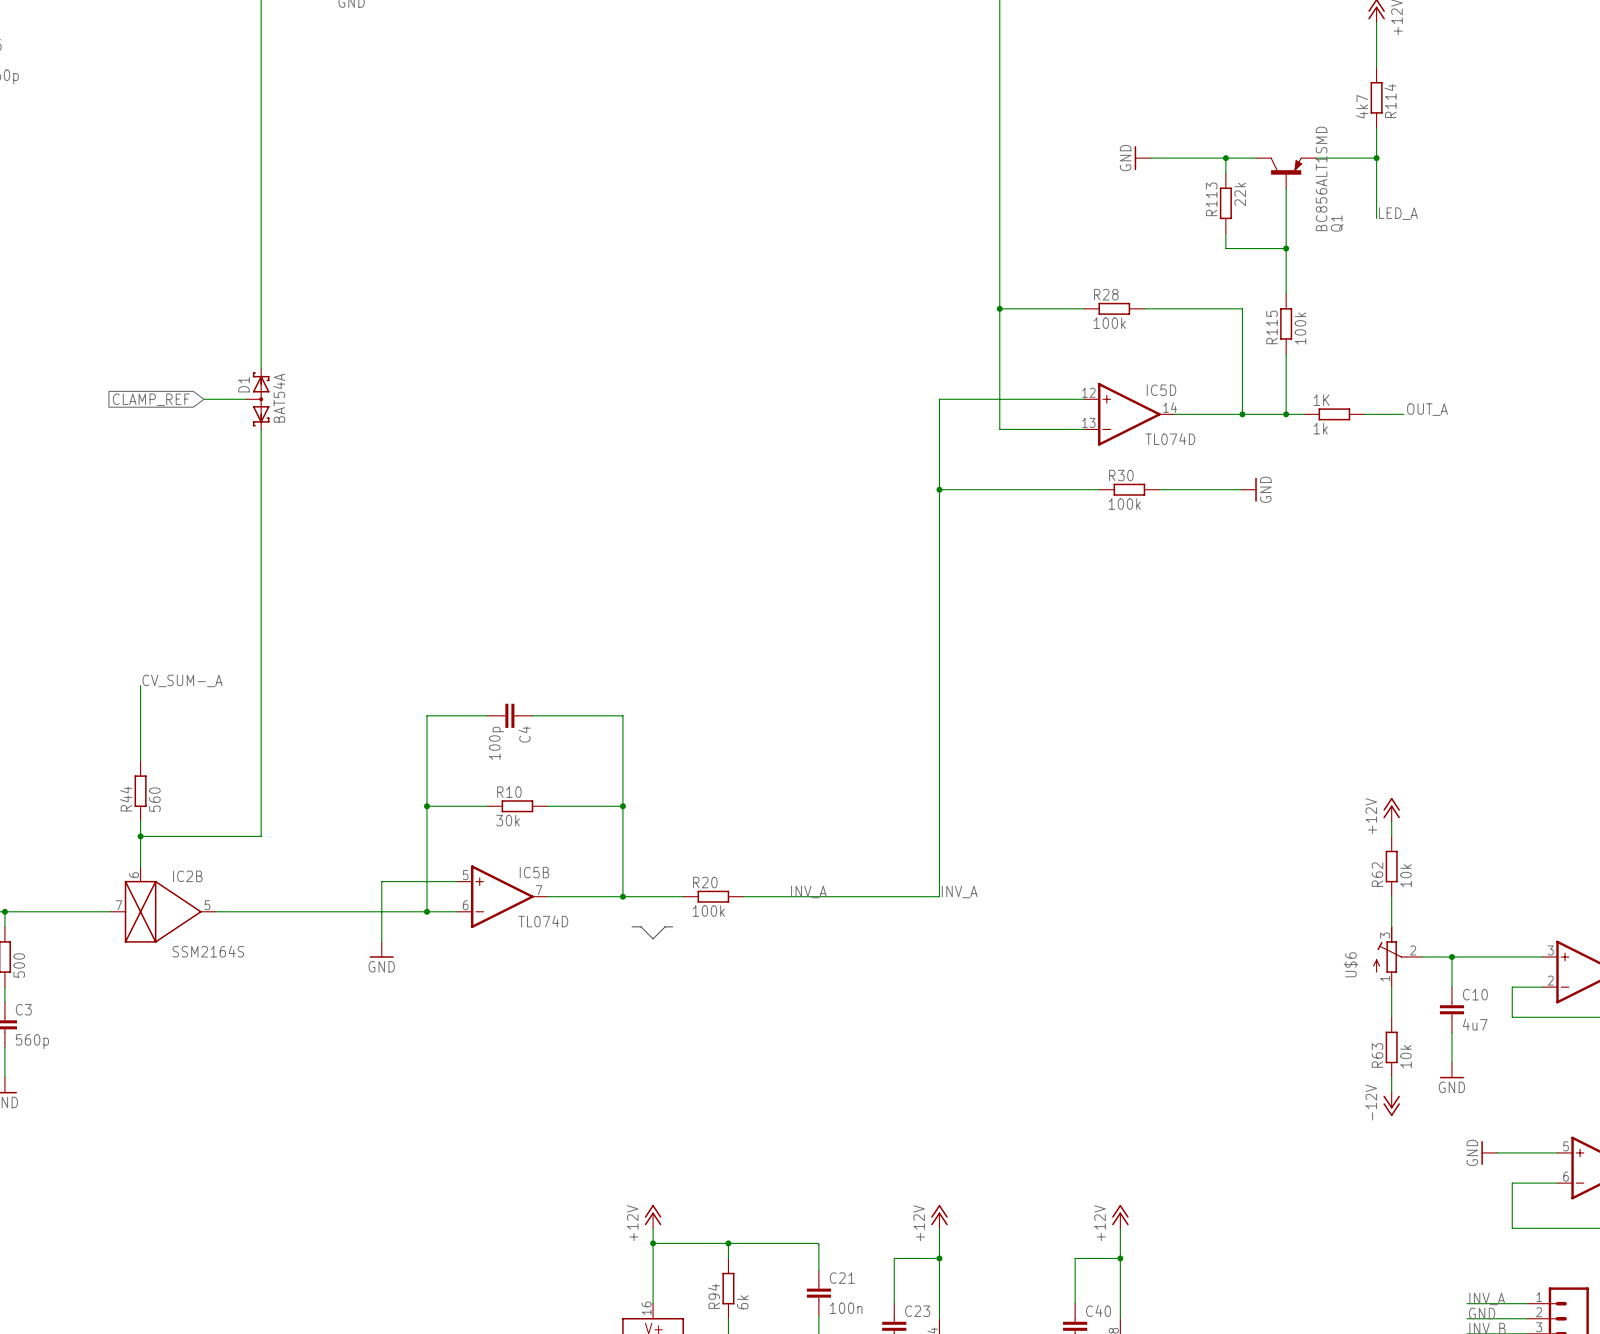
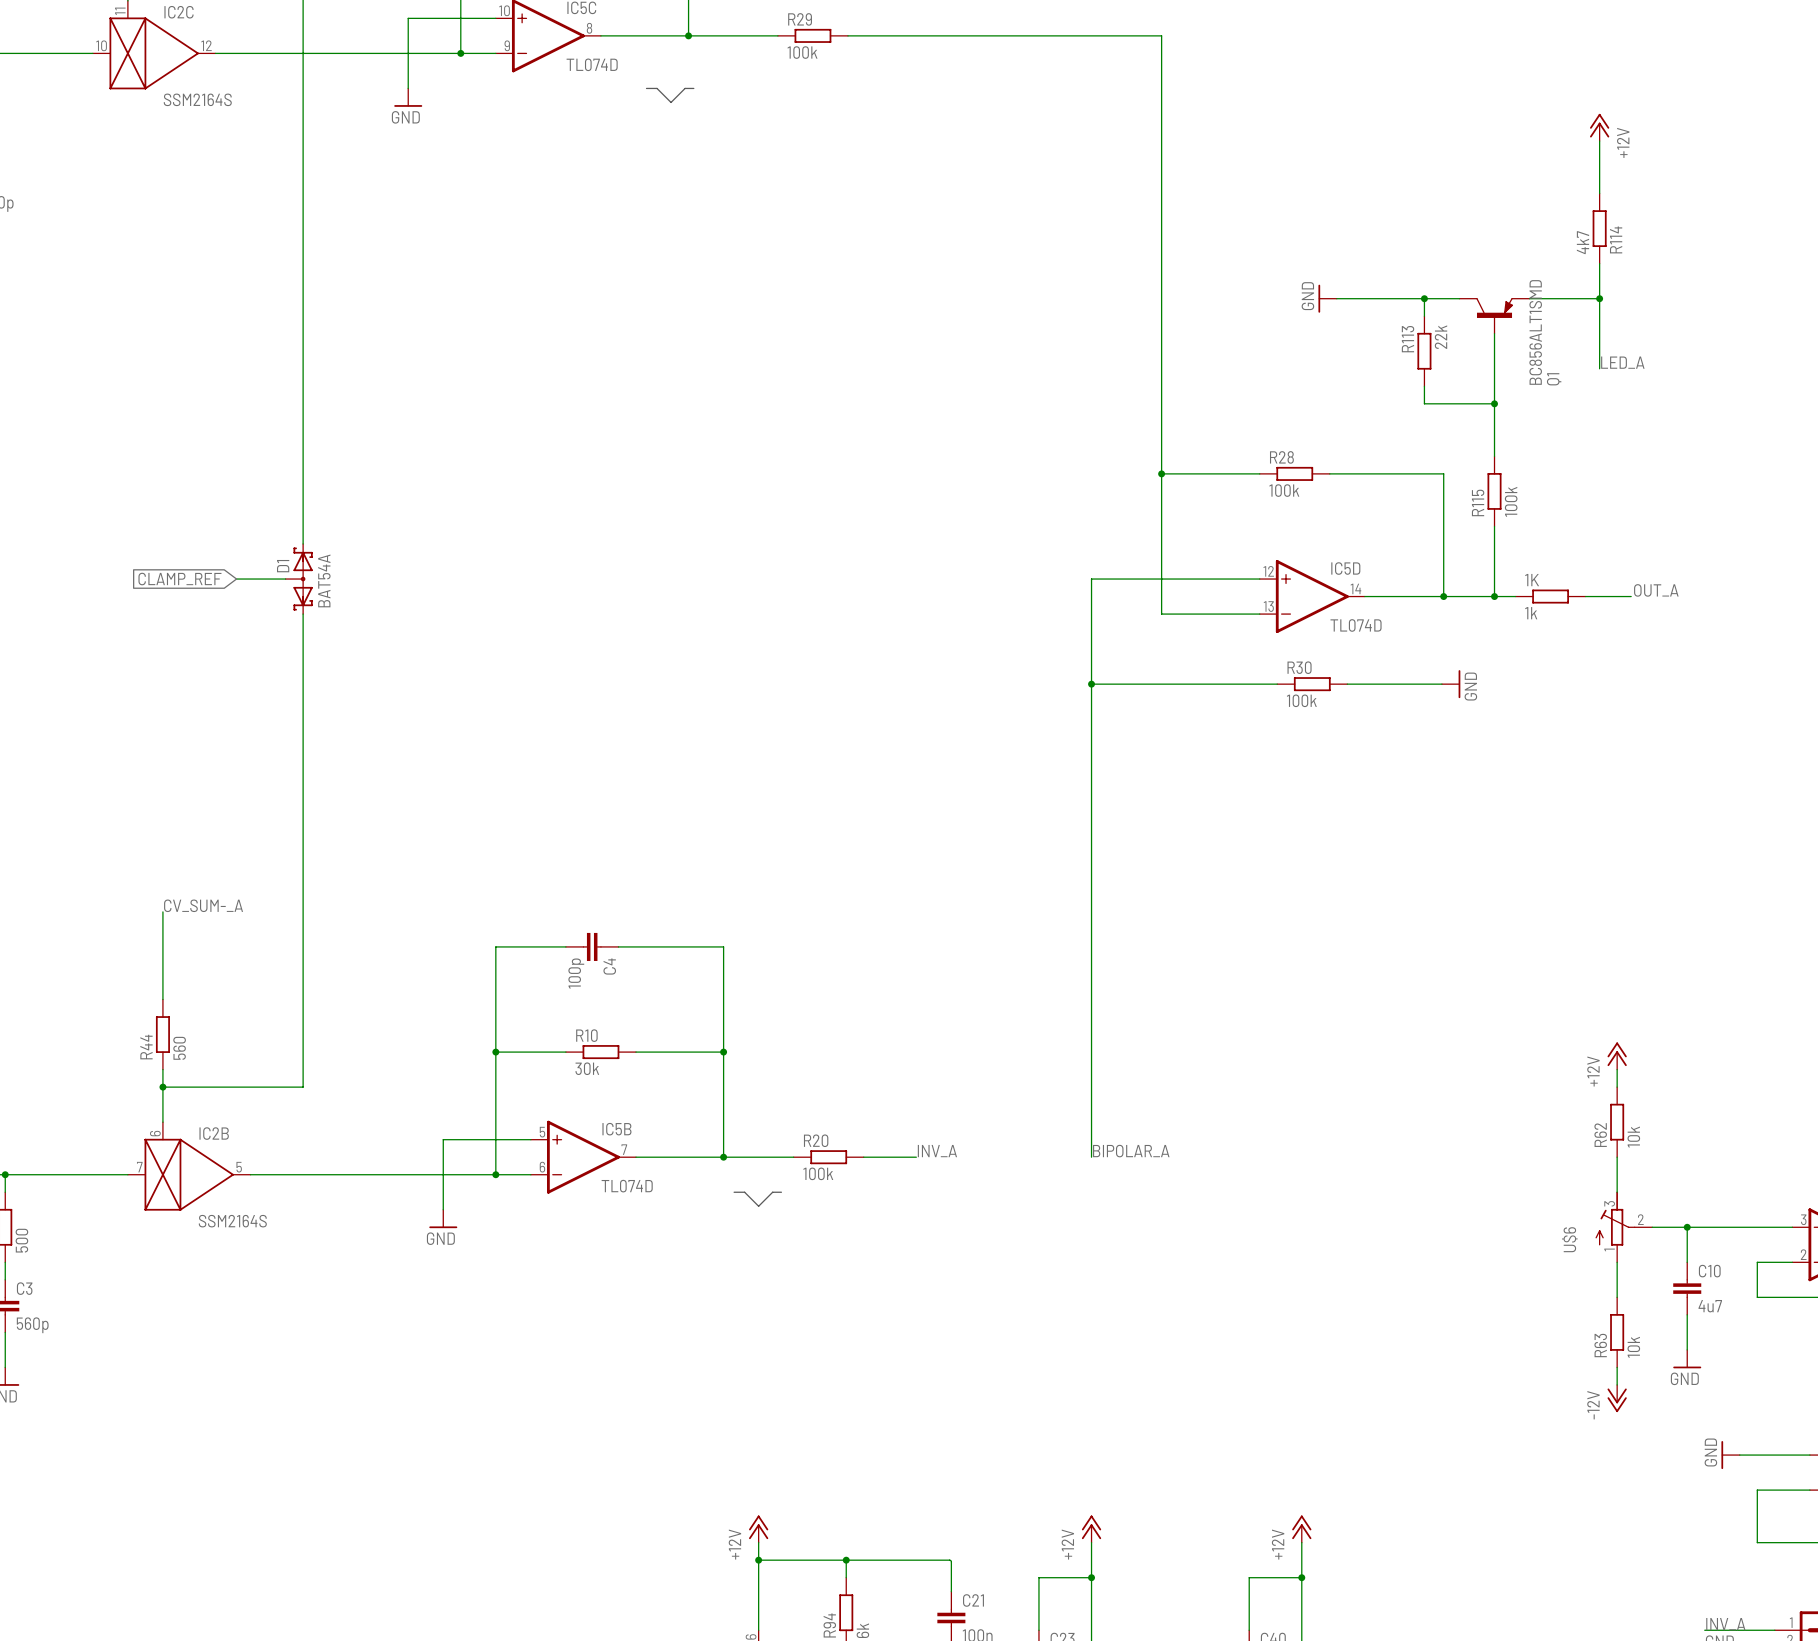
label: INV_A (959, 891) -> BIPOLAR_A (1131, 1151)
wire: (788, 896) (939, 896) -> none

